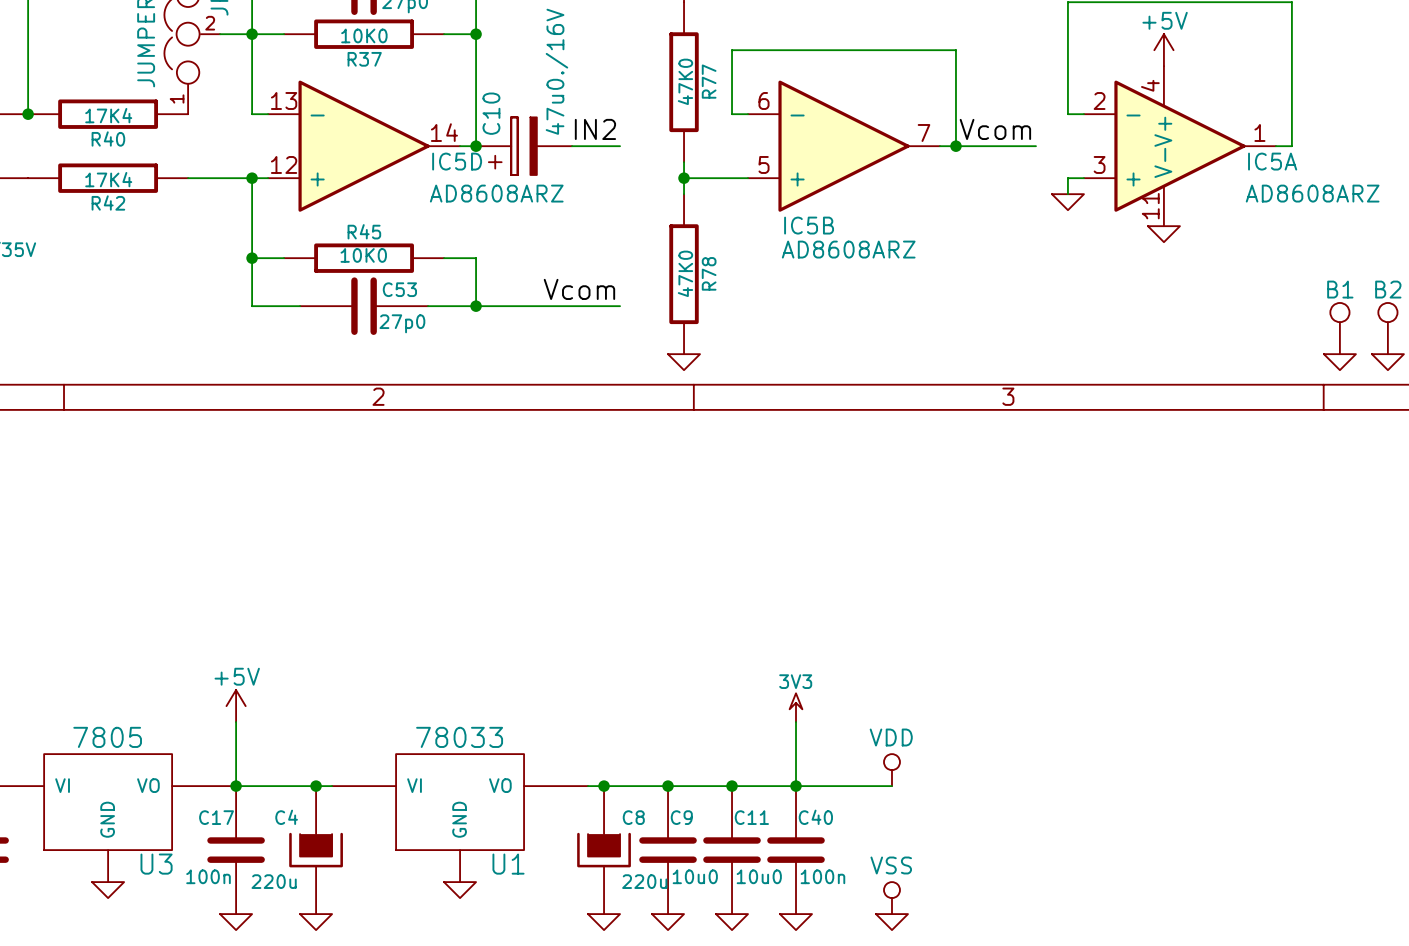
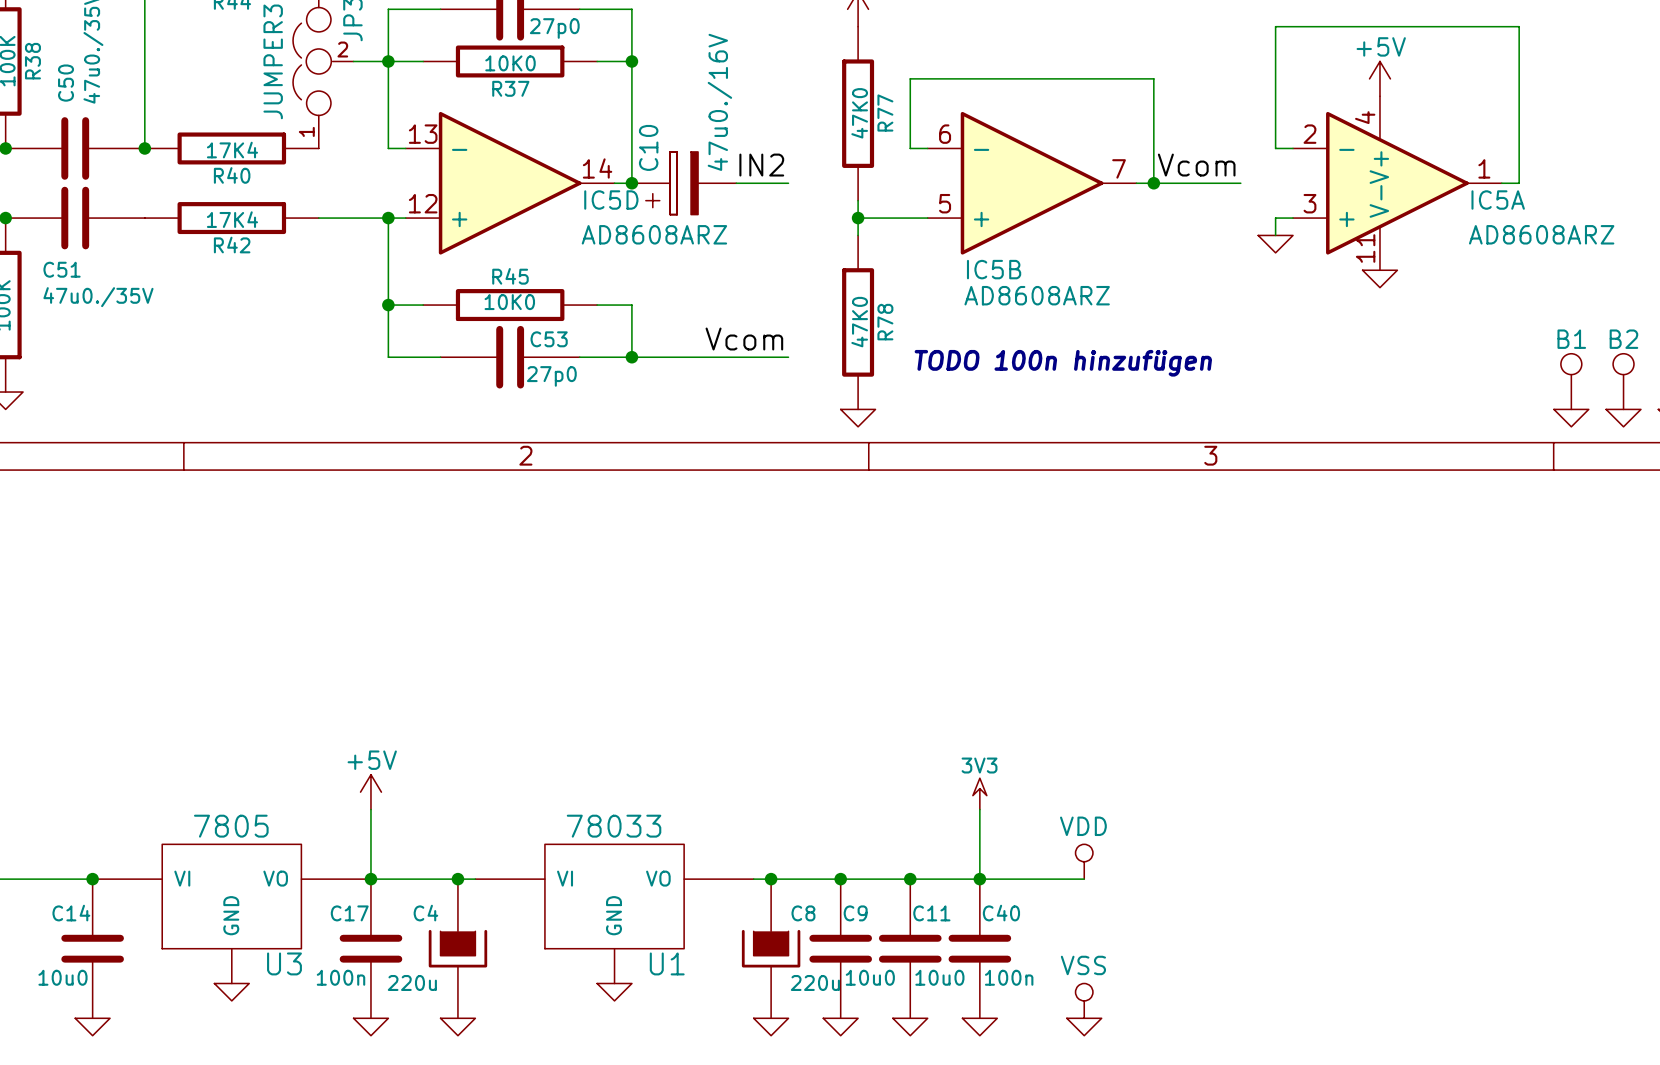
text: none -> TODO 100n hinzufügen (1063, 363)

